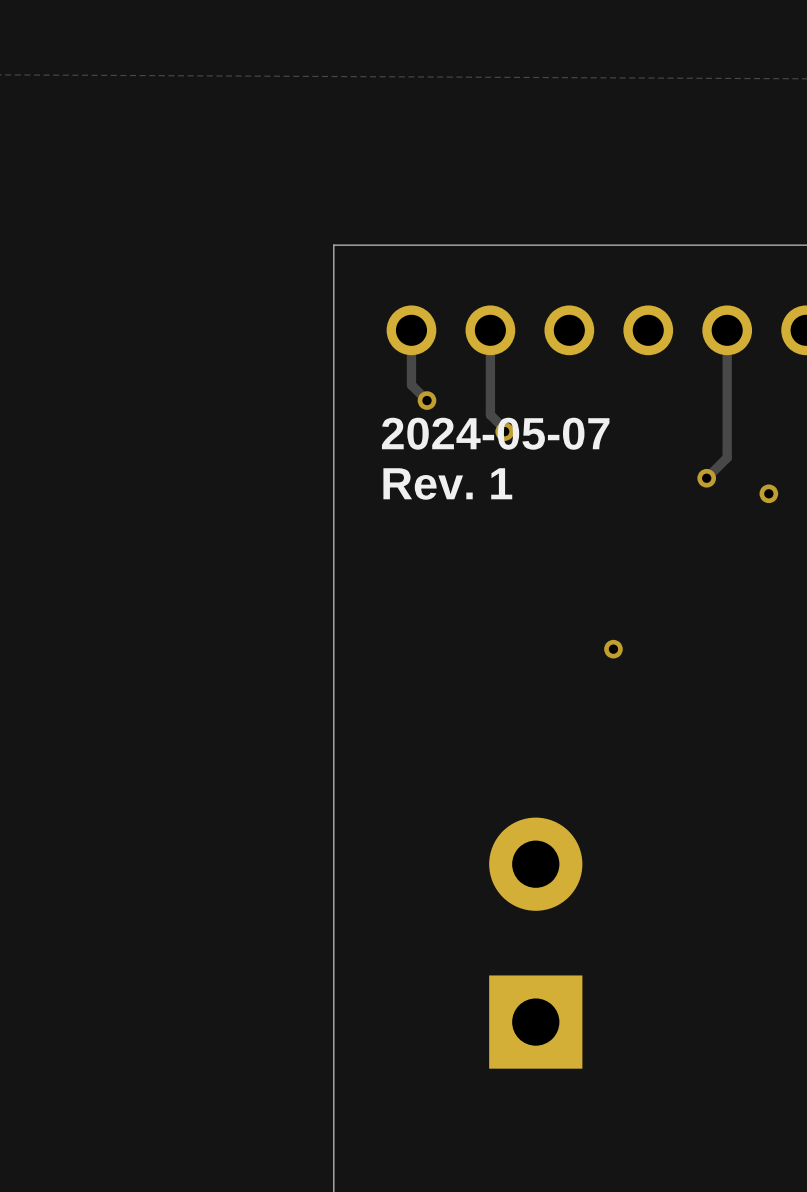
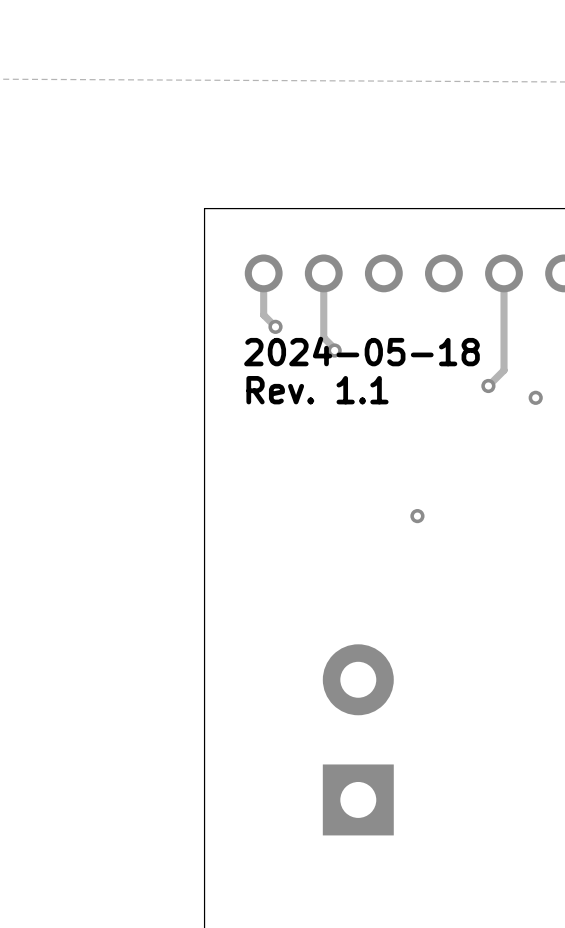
text: 2024-05-07 (495, 433) -> 2024-05-18 (361, 351)
text: Rev. 1 (447, 483) -> Rev. 1.1 (317, 390)

